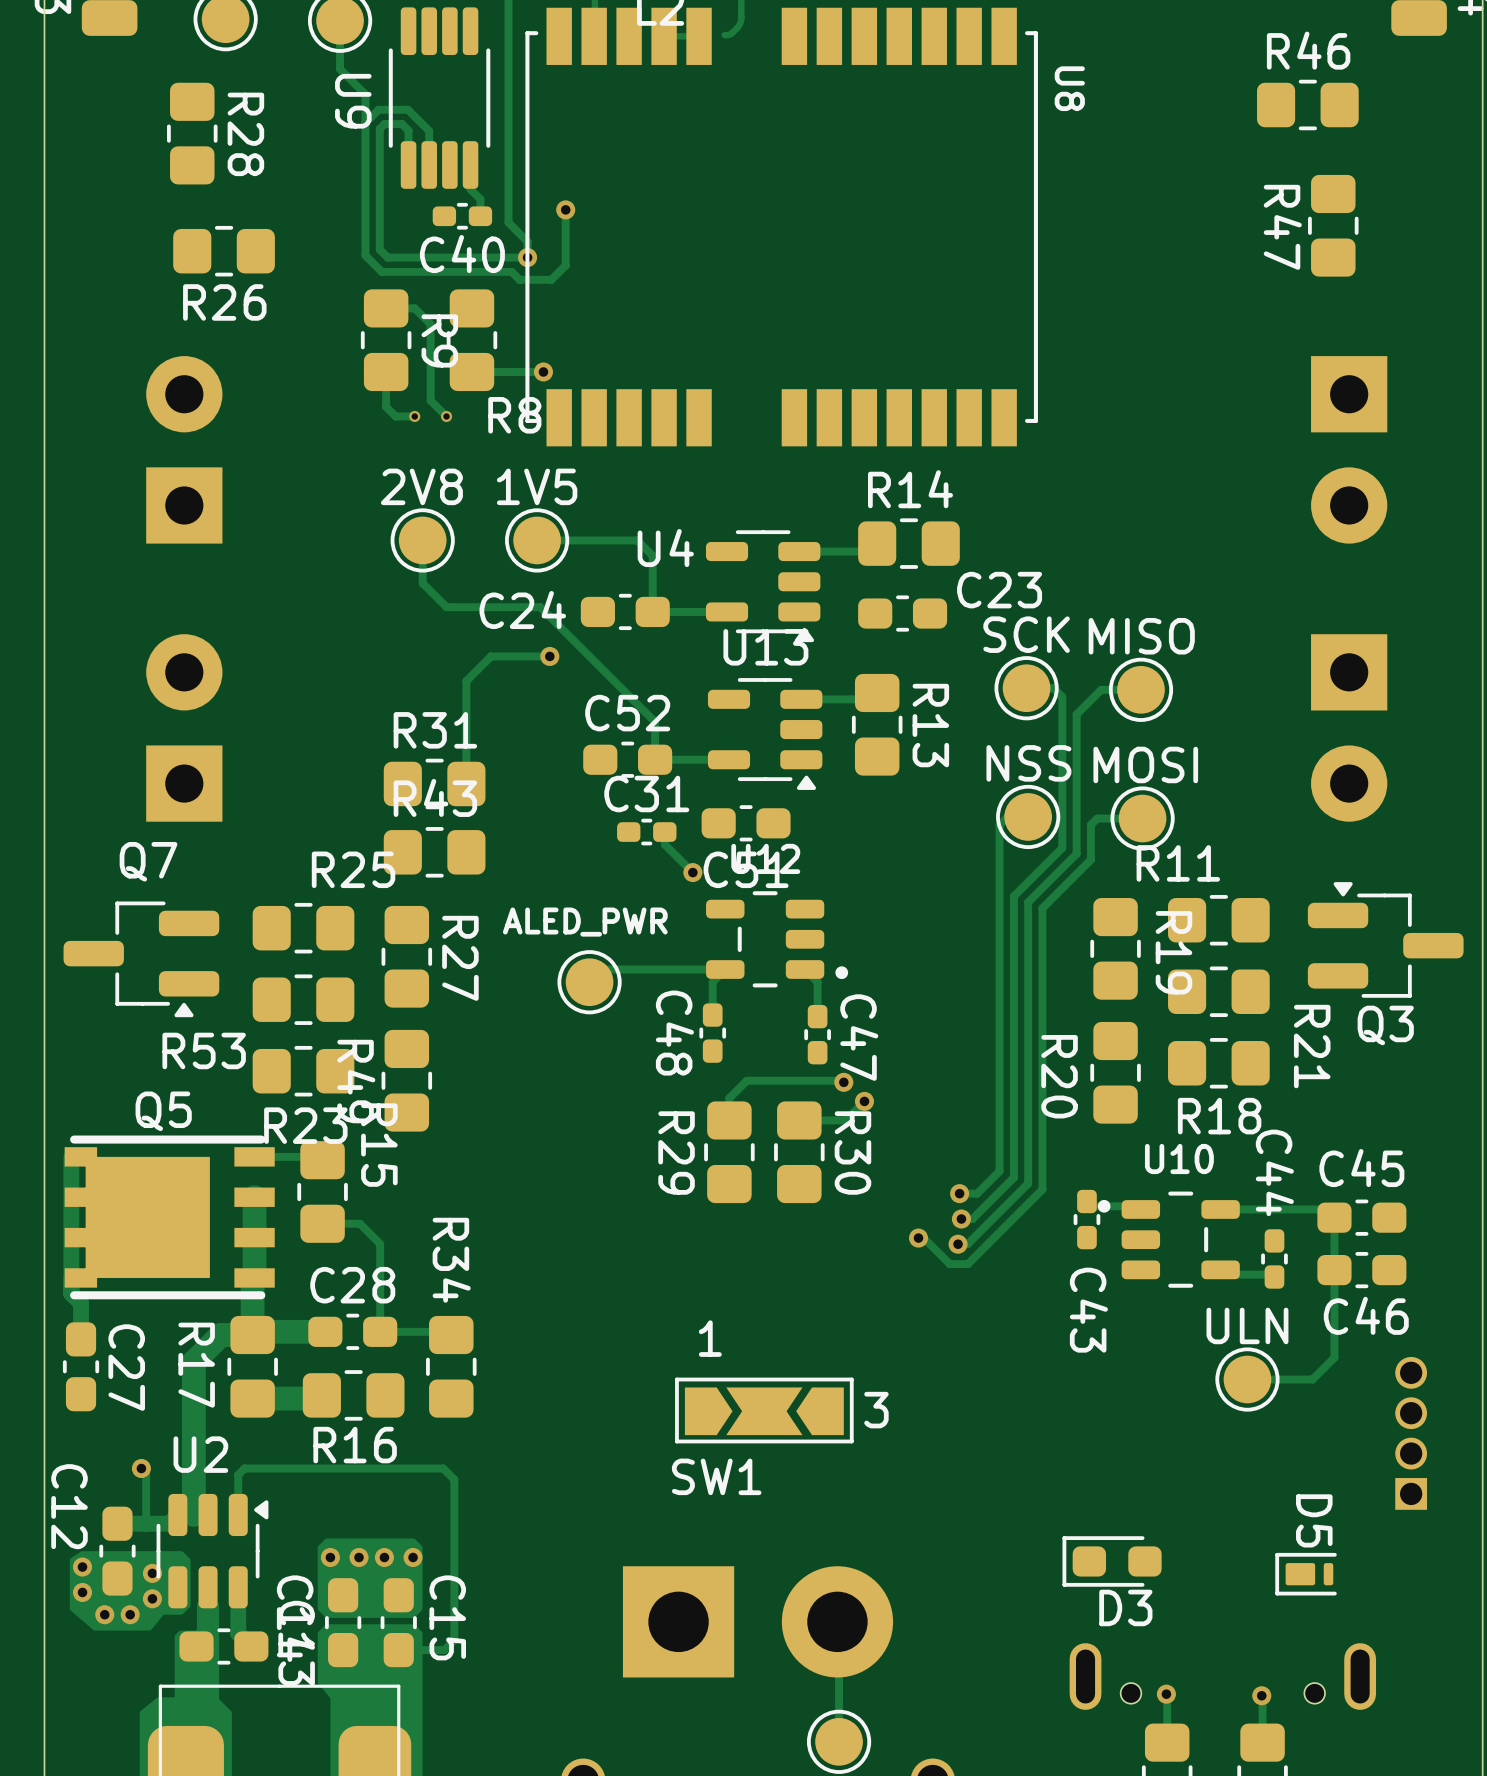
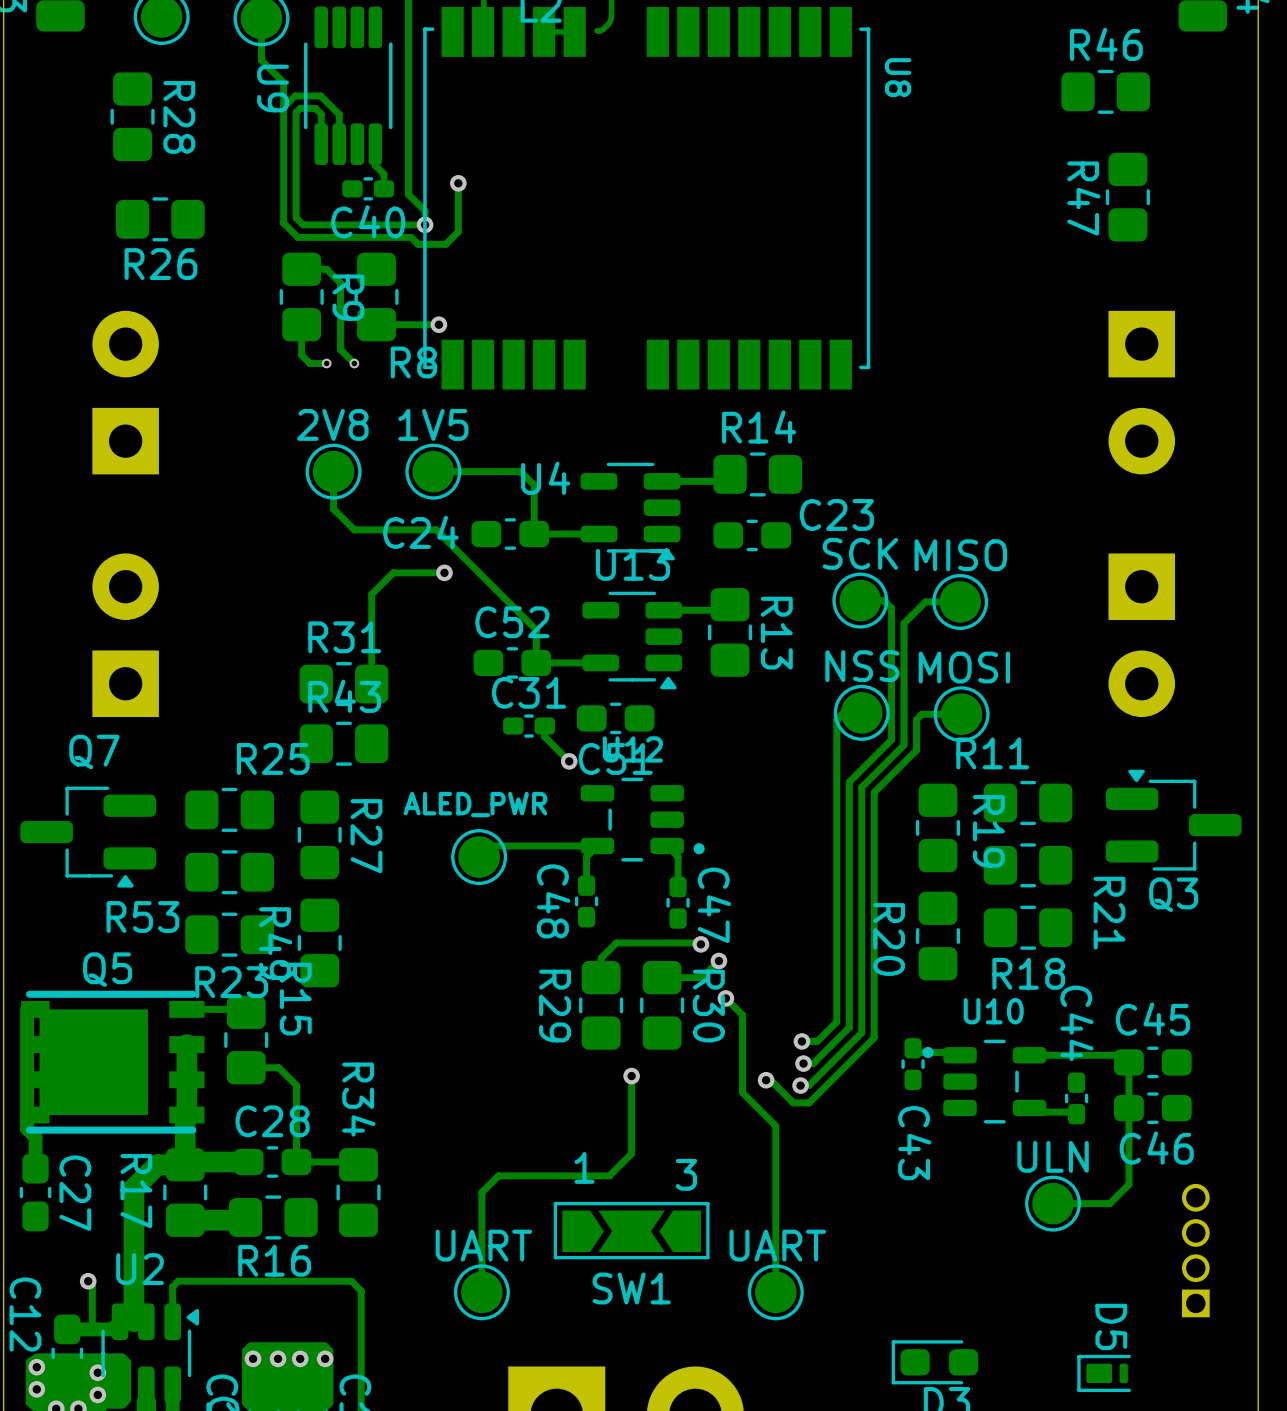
track: none -> (725, 998) (742, 1015) (742, 1092) (775, 1125) (775, 1297)
via: none -> (725, 998)
track: none -> (631, 1076) (631, 1153) (609, 1175) (498, 1175) (481, 1192) (481, 1292)
via: none -> (631, 1076)
SW1 text position: 3 (876, 1410) -> 3 (686, 1174)
SW1 name position: SW1 (716, 1476) -> SW1 (631, 1288)
UART: none -> (481, 1292)
UART: none -> (775, 1292)

